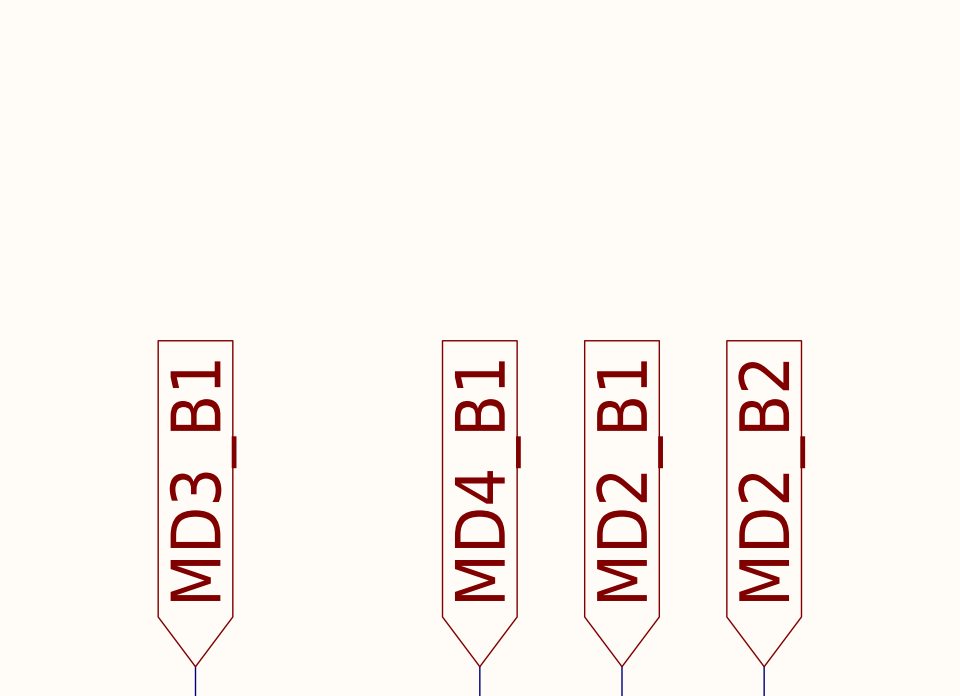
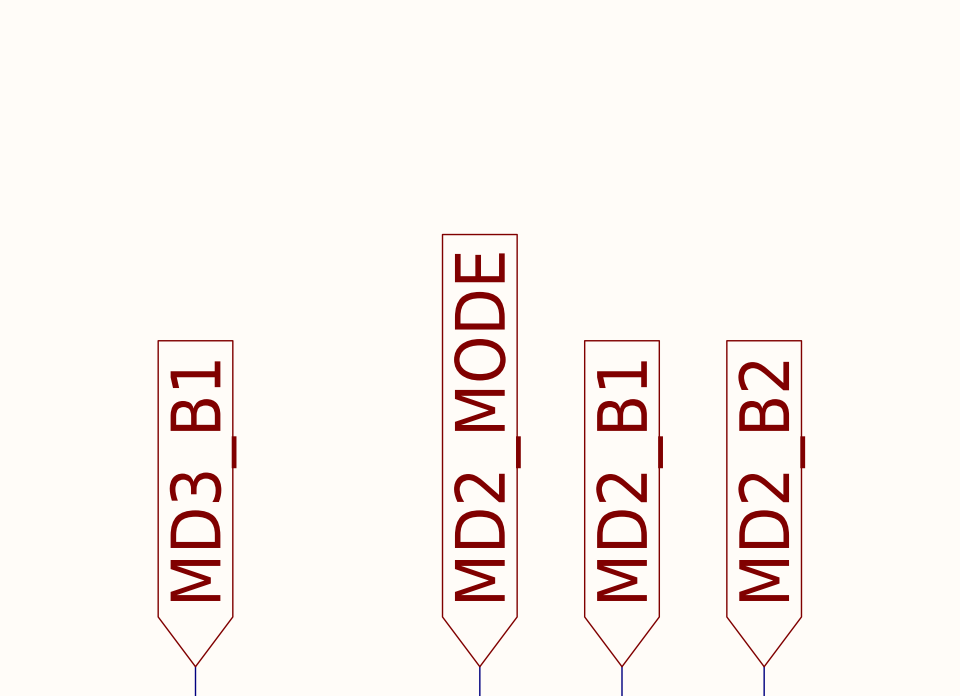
global label: MD4_B1 (487, 481) -> MD2_MODE (487, 427)

